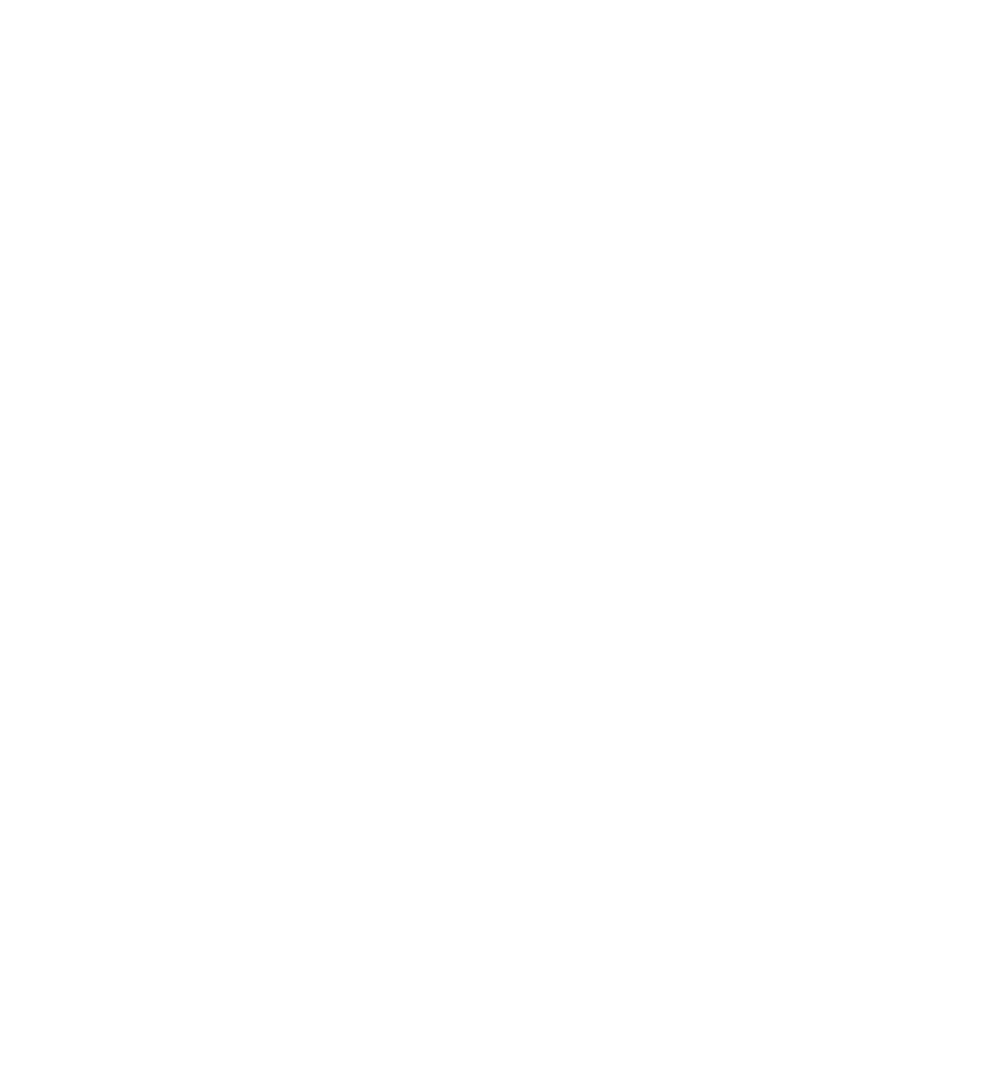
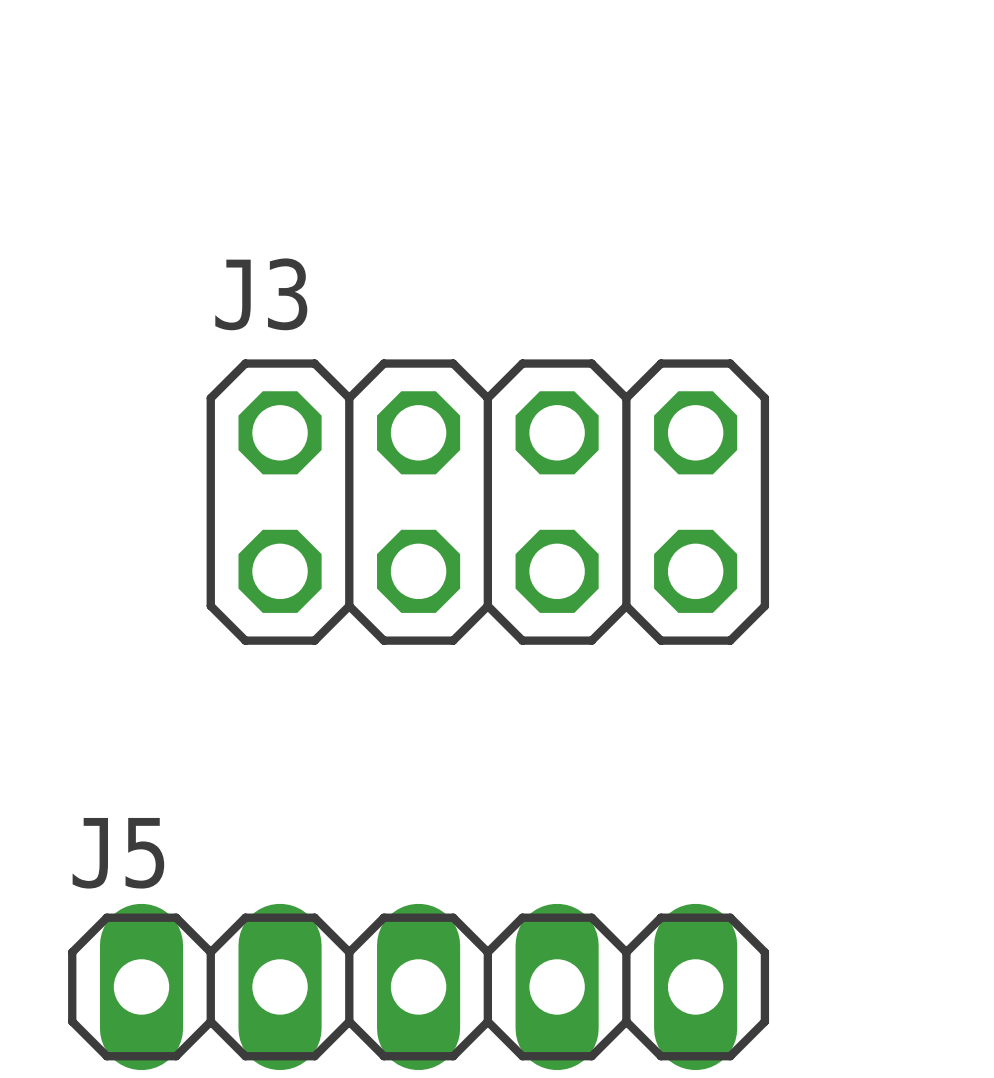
J3: none -> (487, 502)
J5: none -> (418, 986)

